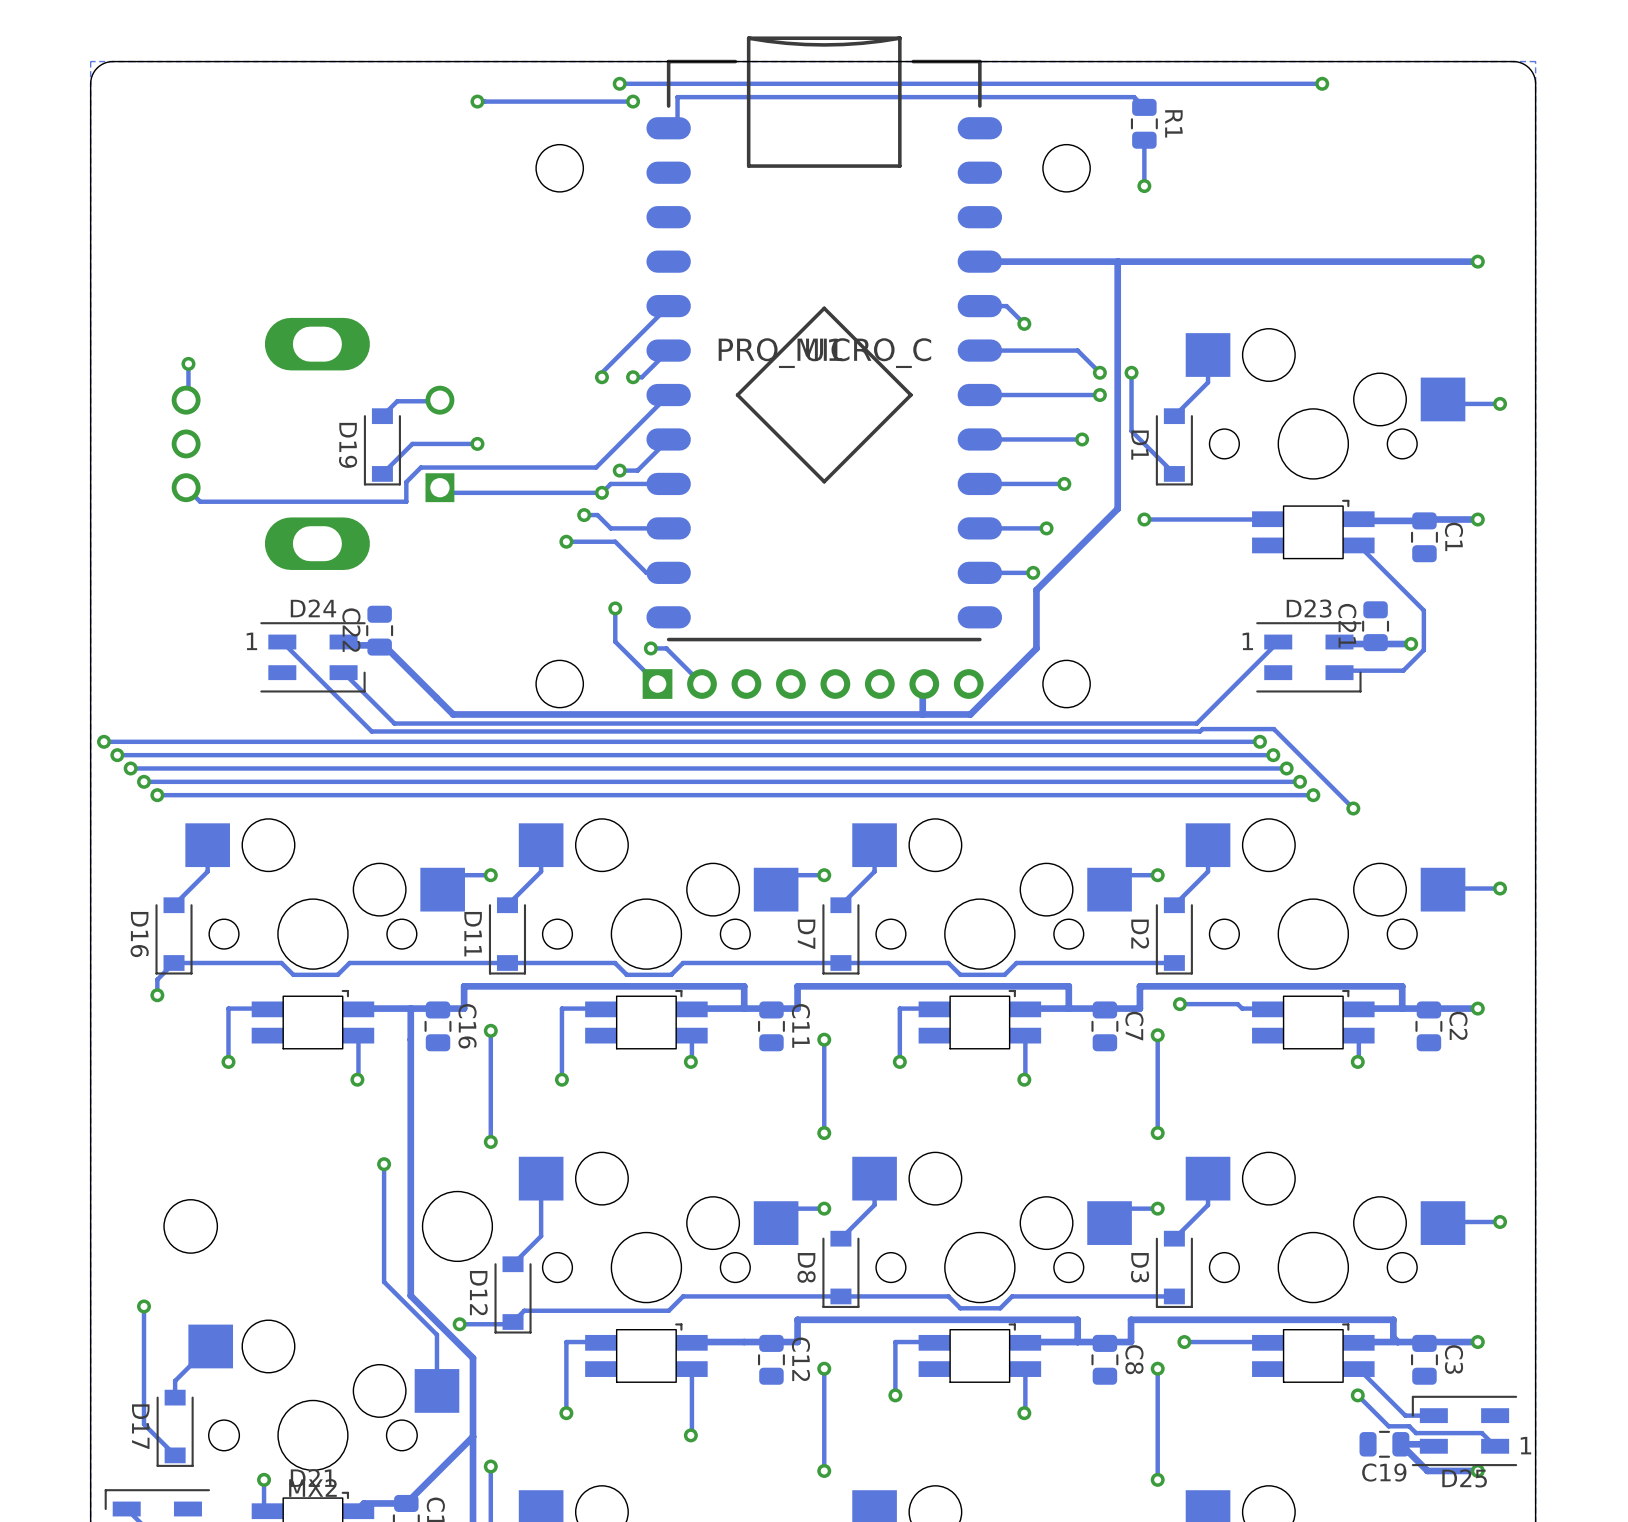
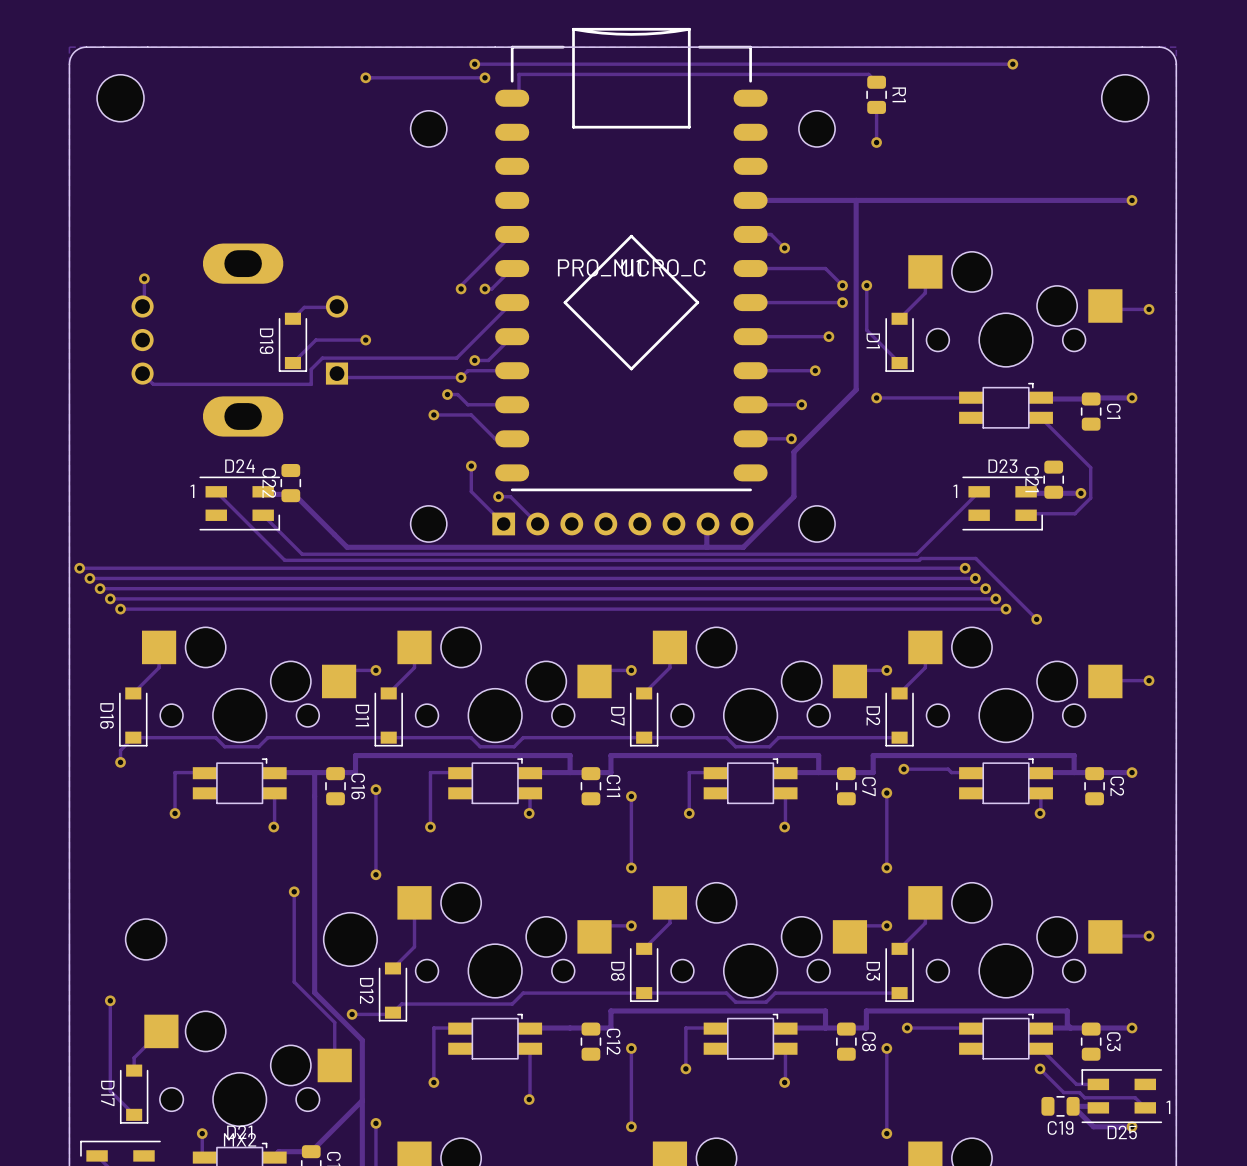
part: none -> (120, 98)
part: none -> (1125, 98)

